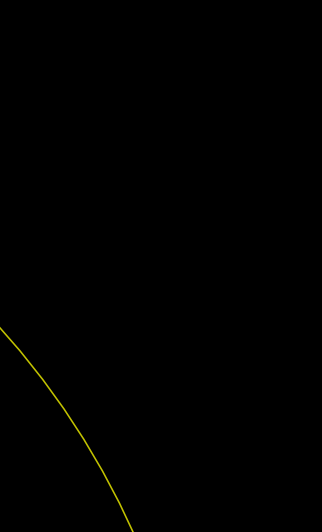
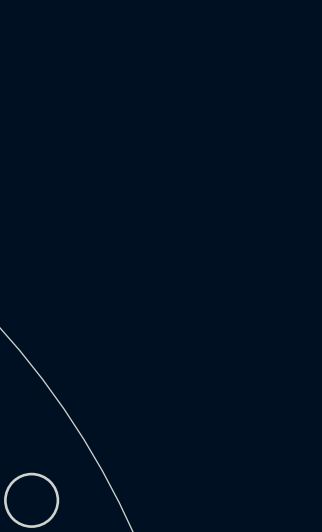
round board edge: none -> [4, 472, 60, 528]

